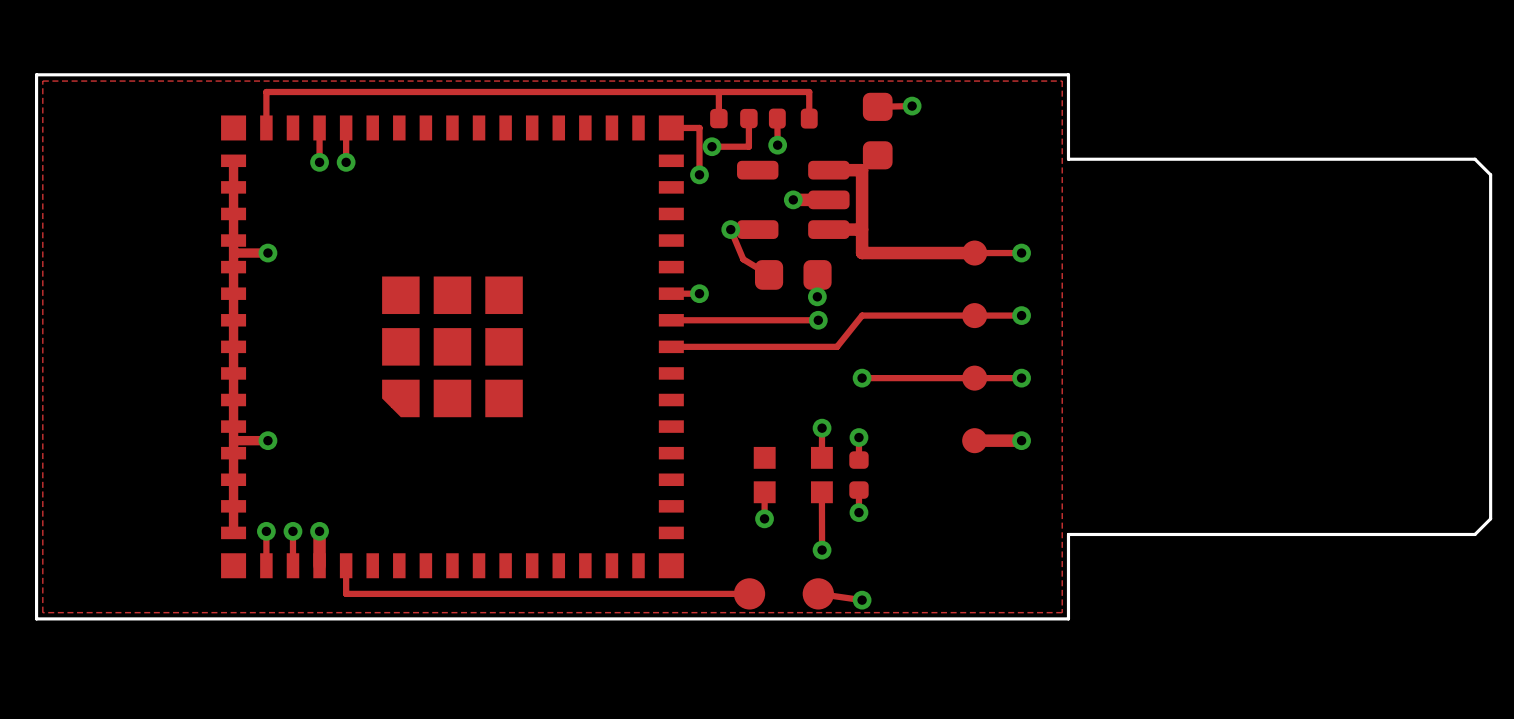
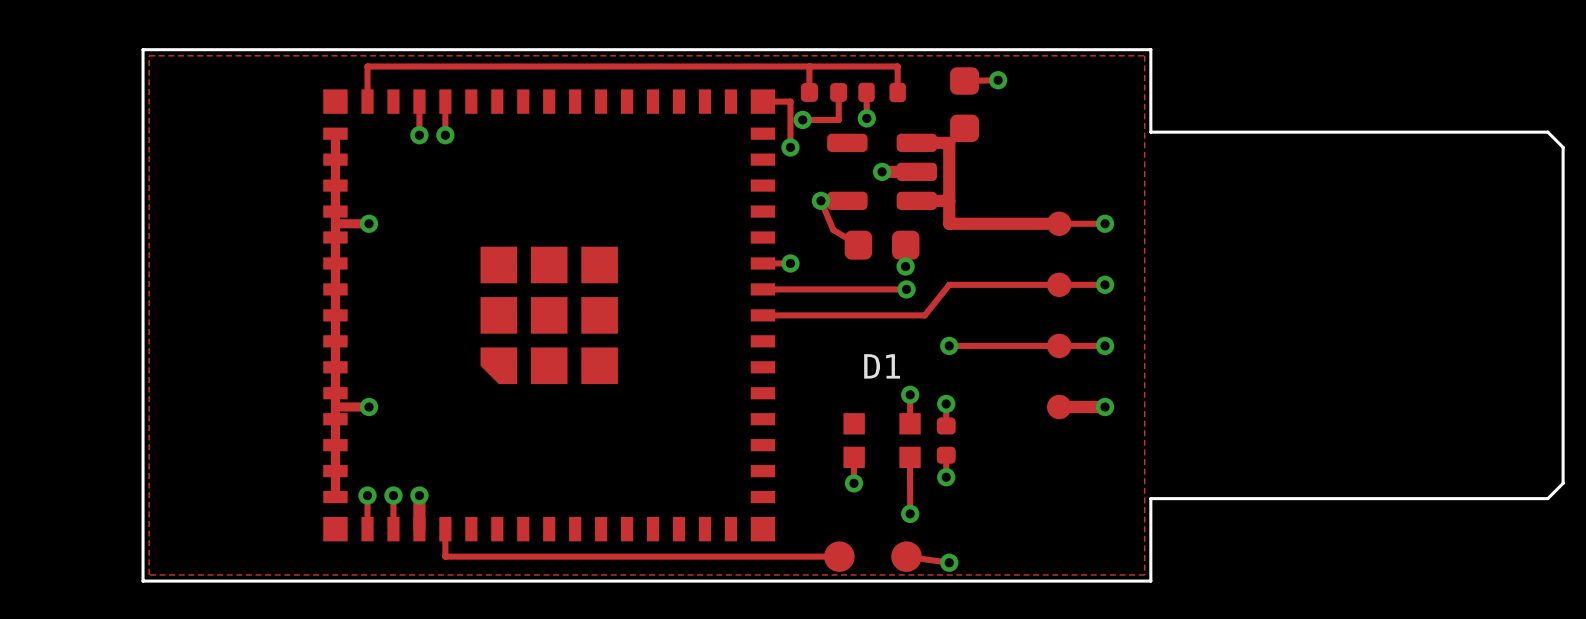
text: none -> D1 (882, 366)

